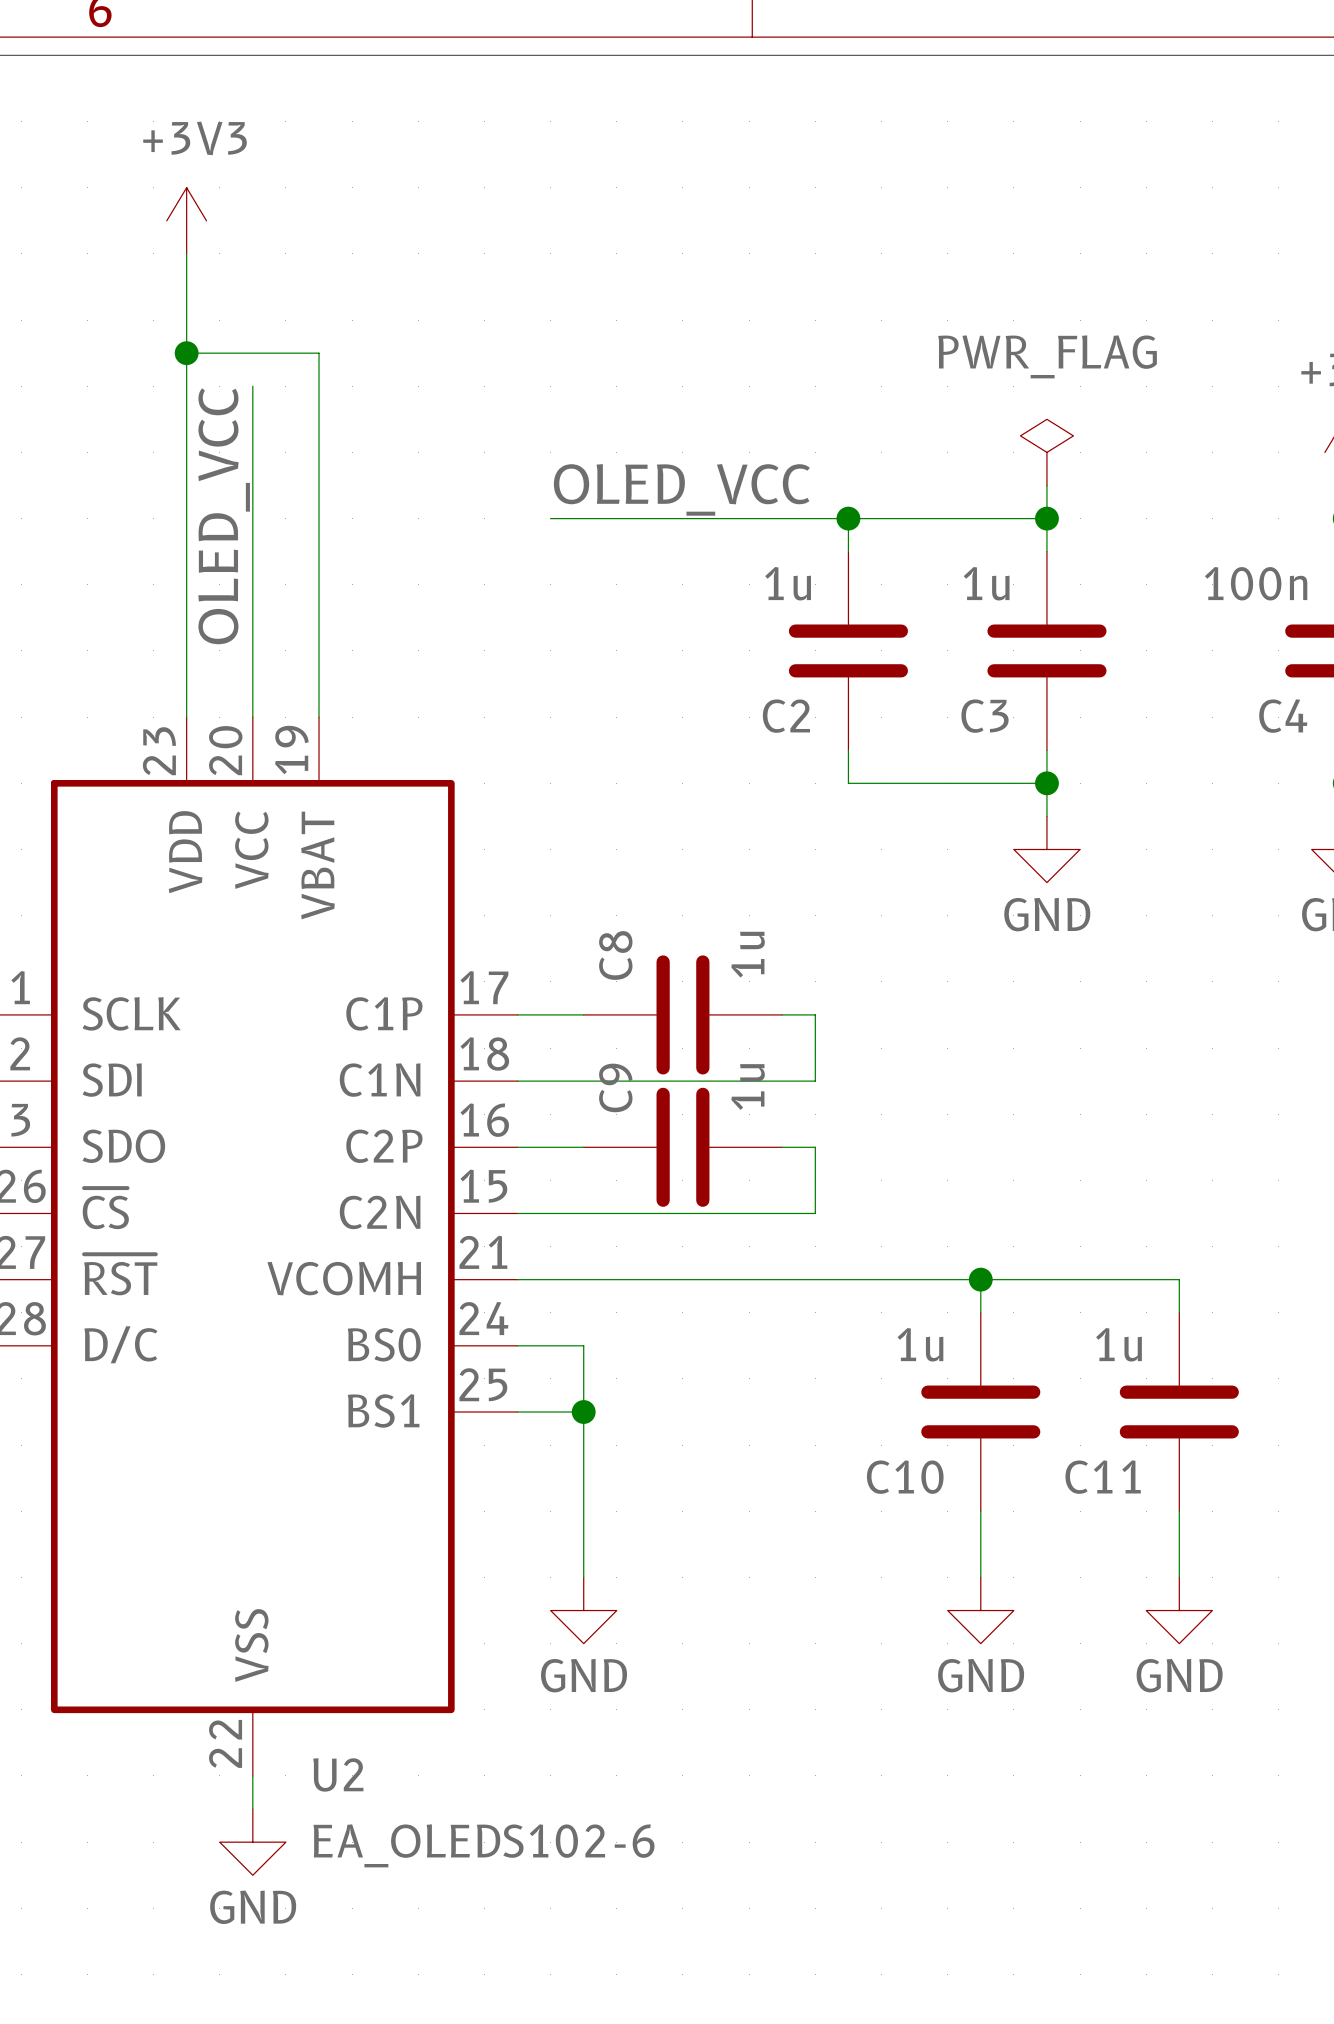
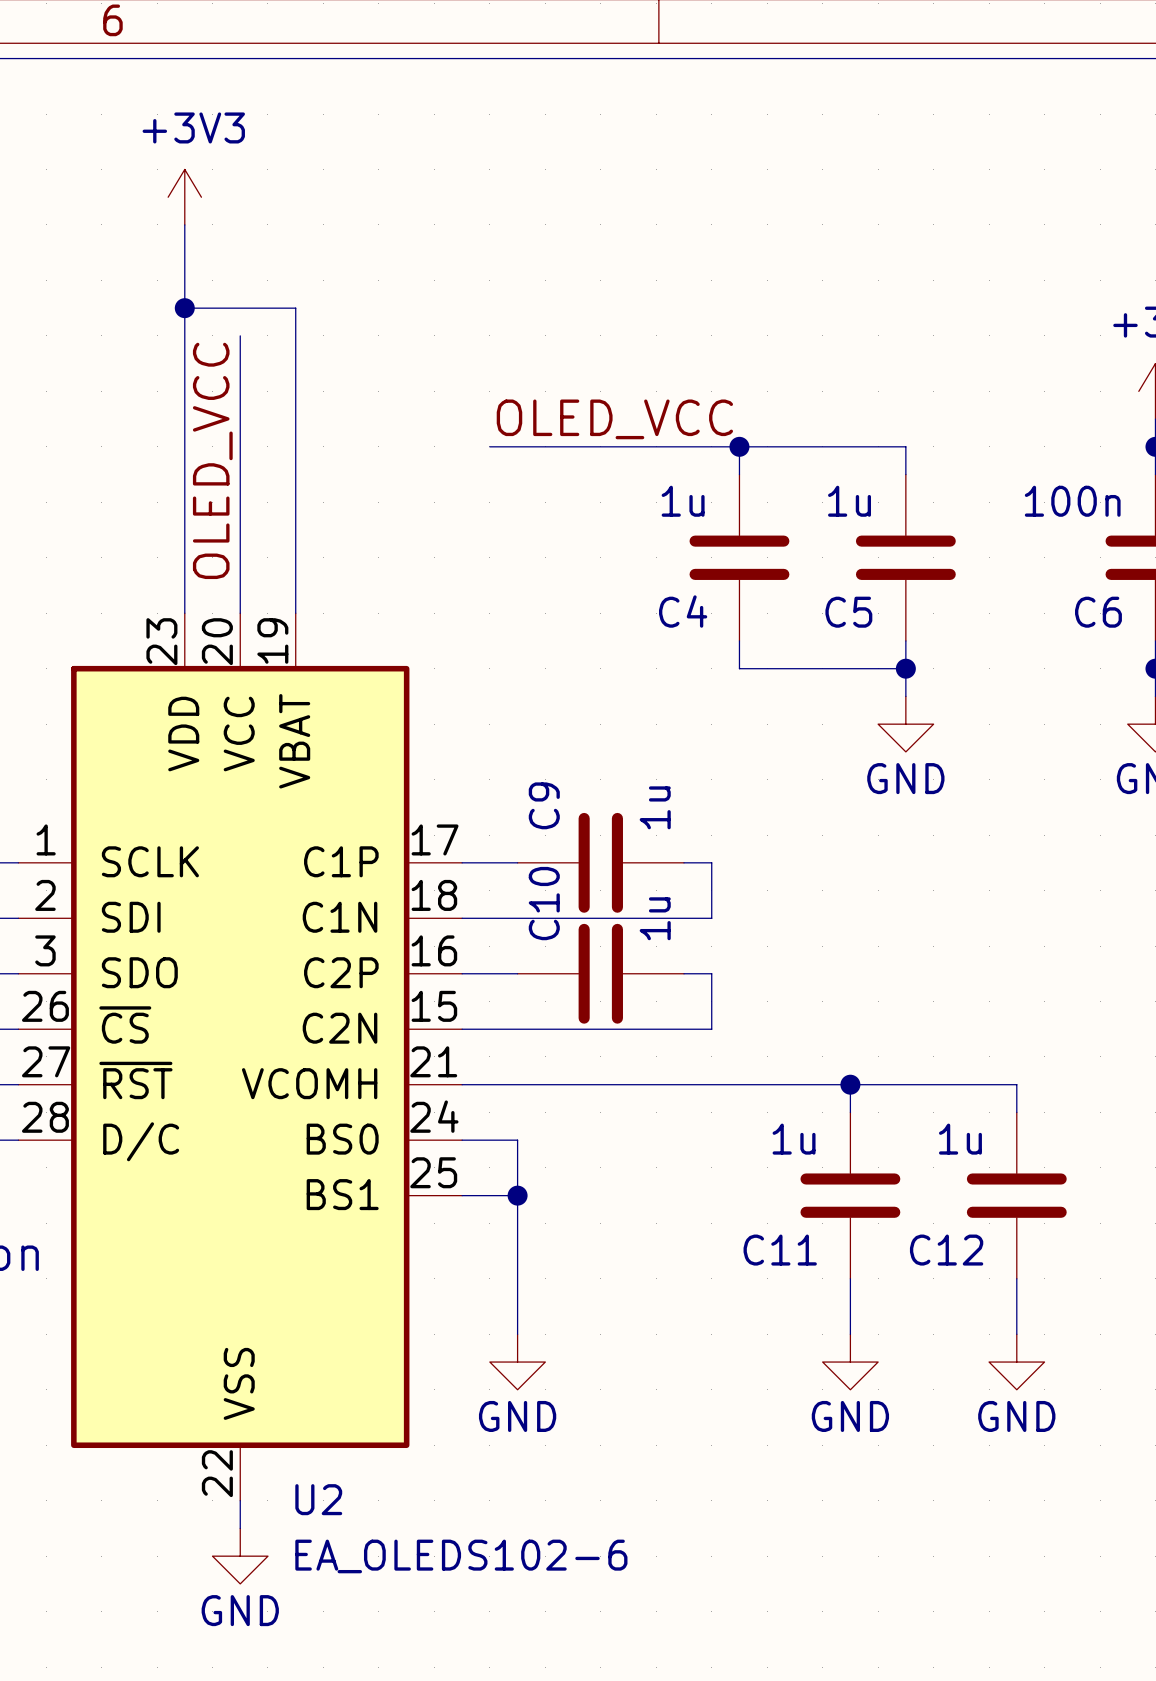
power symbol: PWR_FLAG (1046, 452) -> none
wire: (1046, 485) (1046, 518) -> none
junction: (1046, 518) -> none
C2 name: C2 (786, 716) -> C4 (683, 611)
C3 name: C3 (984, 716) -> C5 (848, 612)
C4 name: C4 (1283, 716) -> C6 (1098, 612)
C8 name: C8 (615, 955) -> C9 (544, 805)
C9 name: C9 (615, 1087) -> C10 (544, 903)
C10 name: C10 (905, 1477) -> C11 (780, 1250)
C11 name: C11 (1103, 1477) -> C12 (946, 1250)

